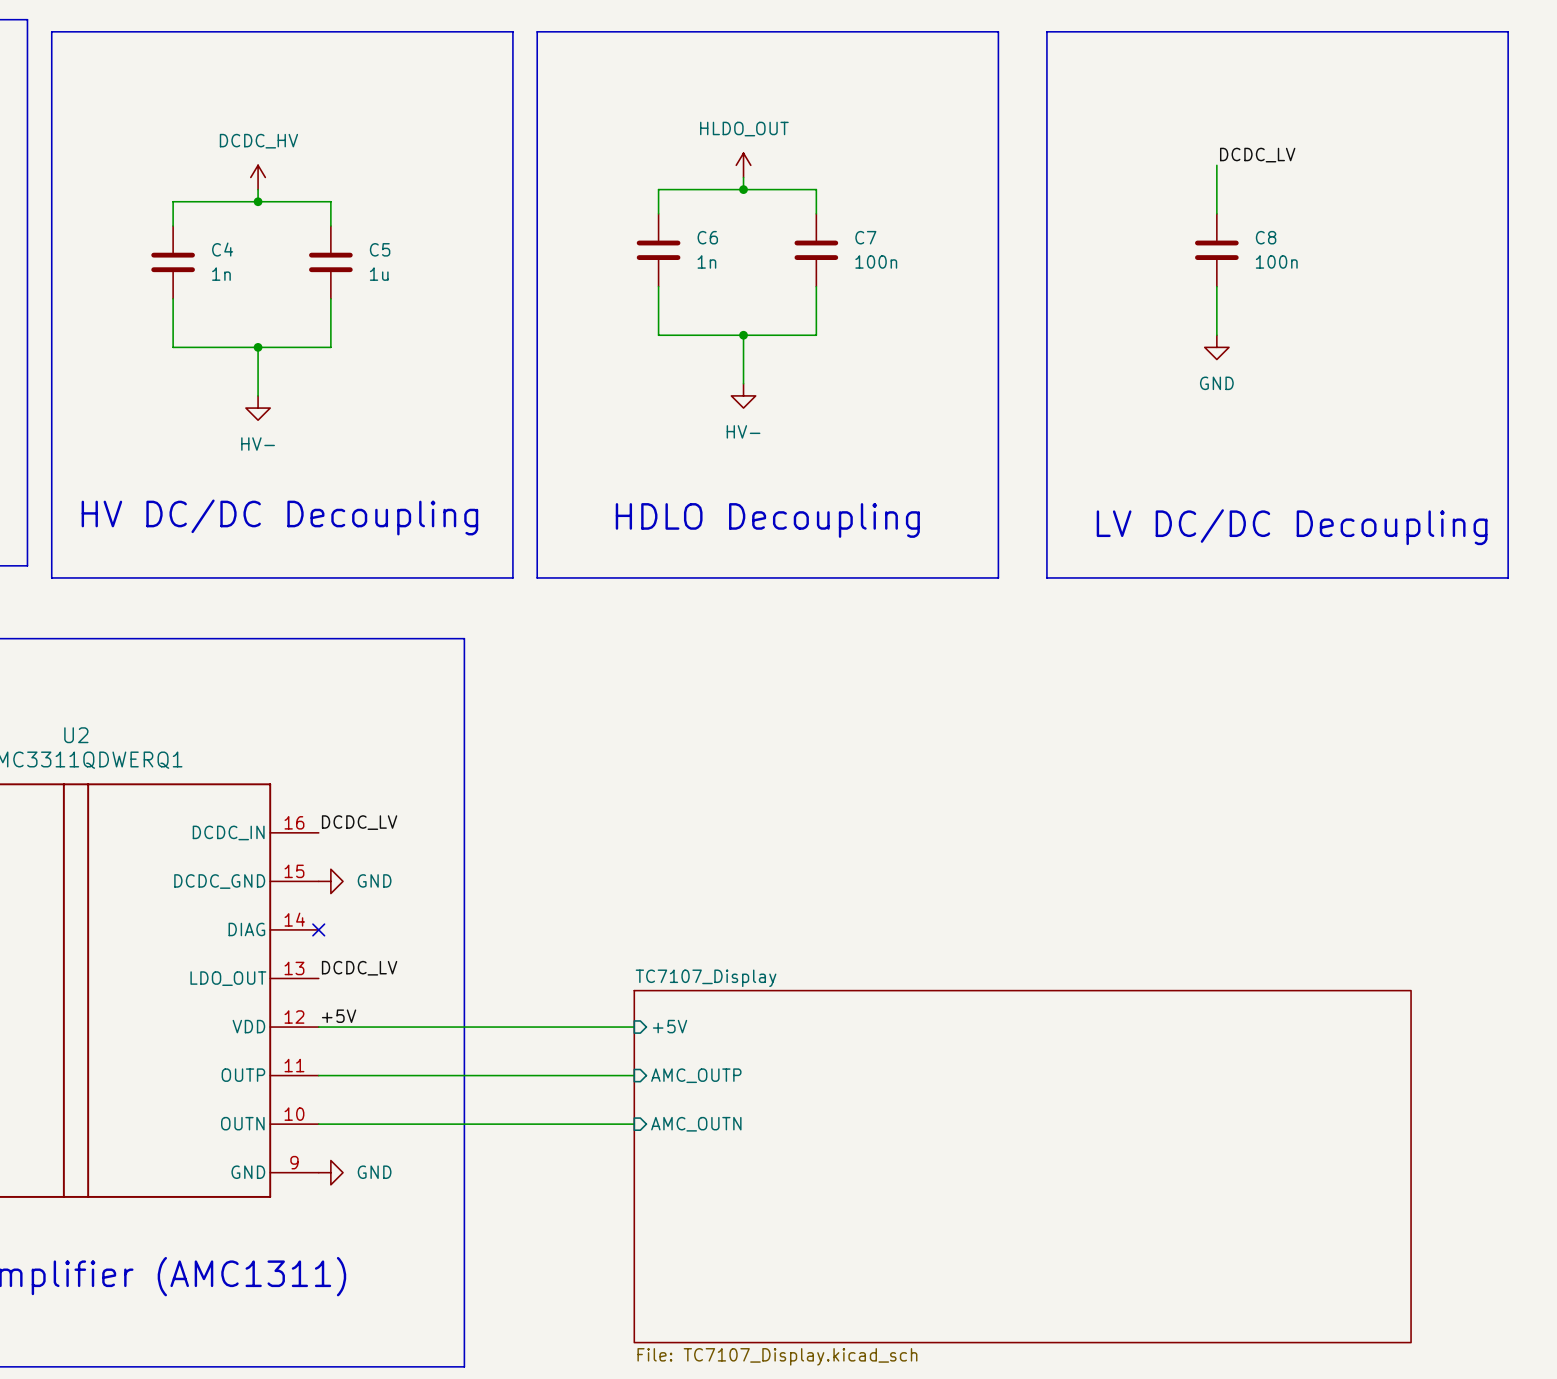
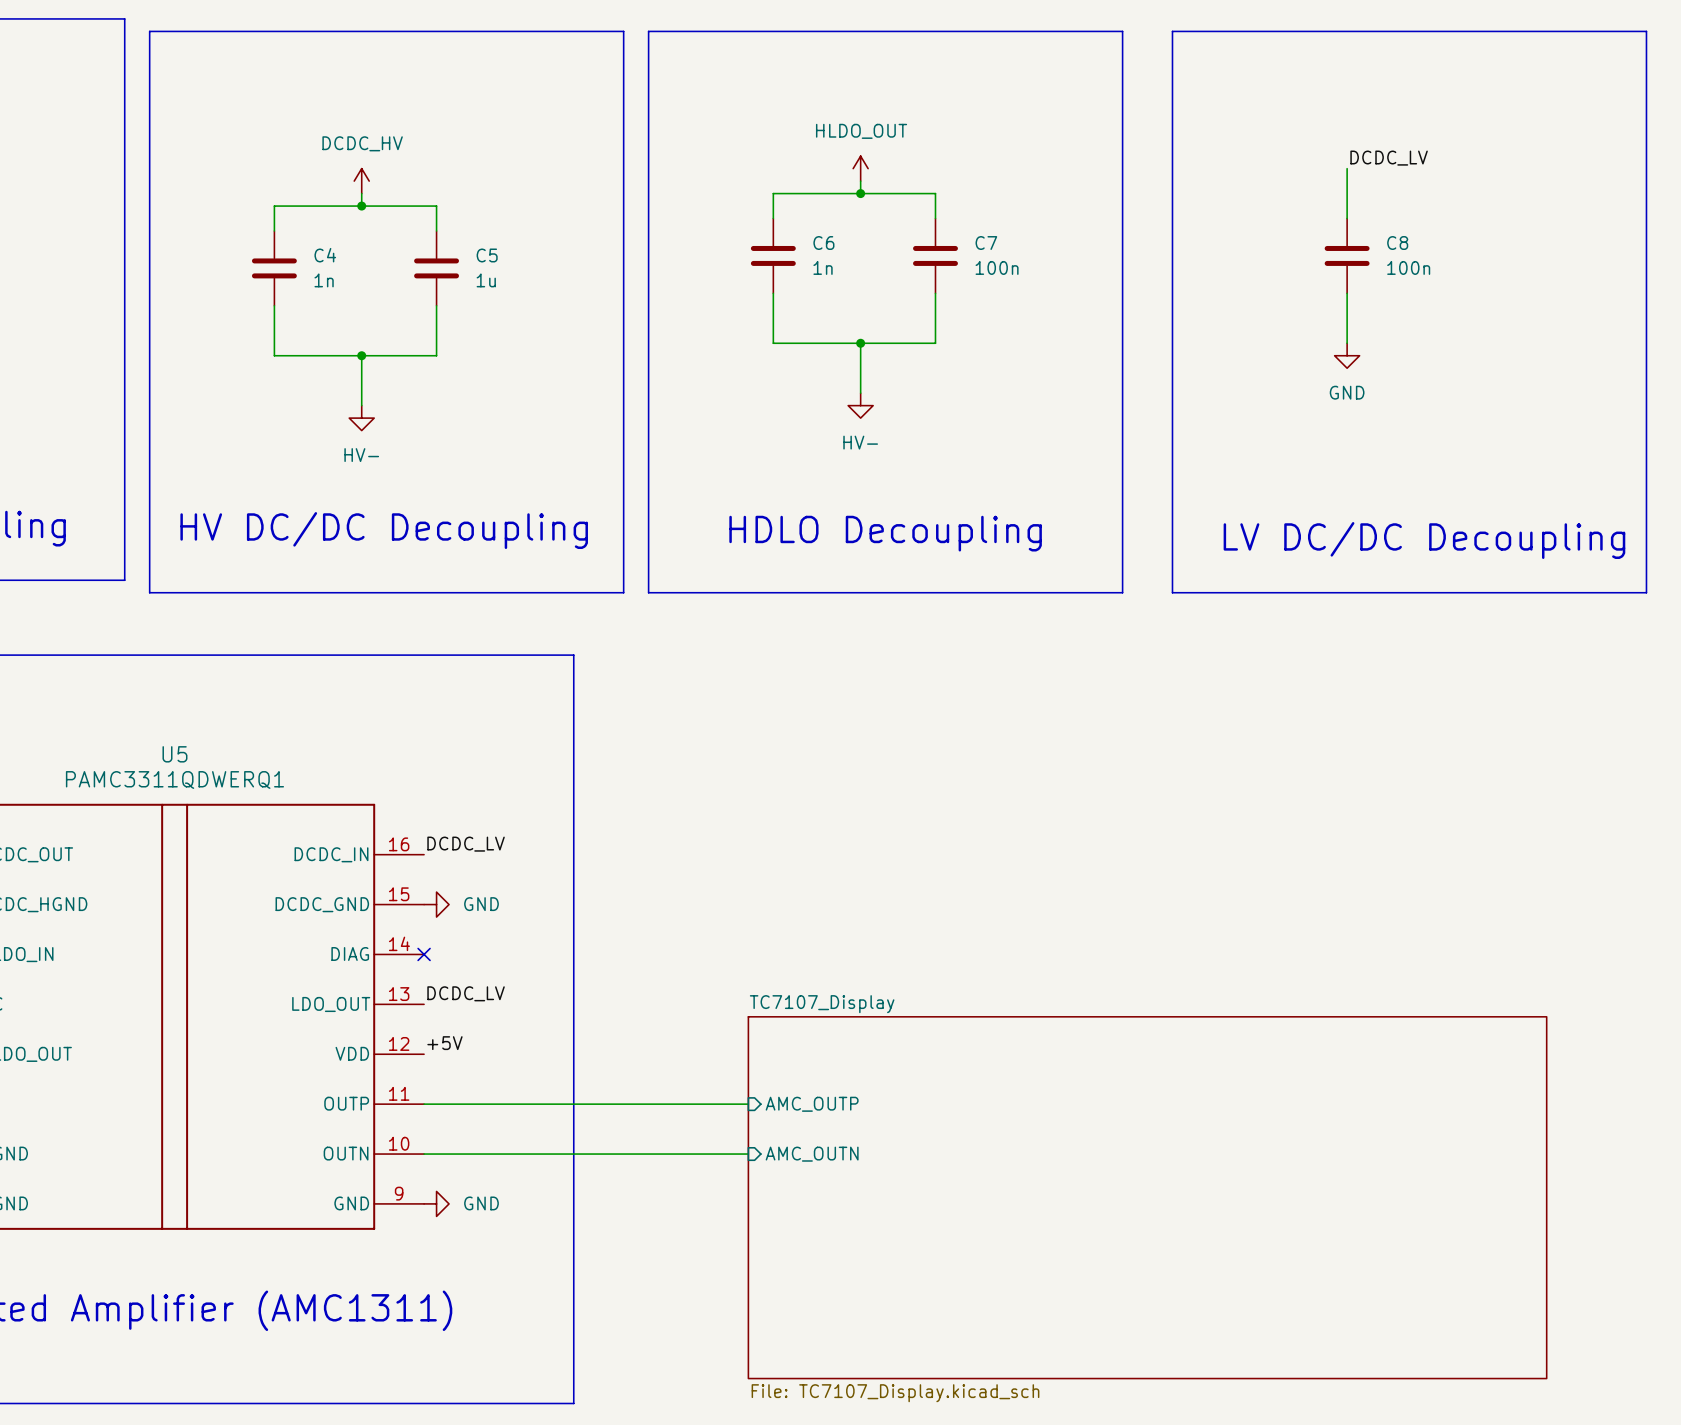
U2 name: U2 (76, 735) -> U5 (174, 754)
sheet pin: +5V (670, 1026) -> none
wire: (318, 1027) (634, 1027) -> none

